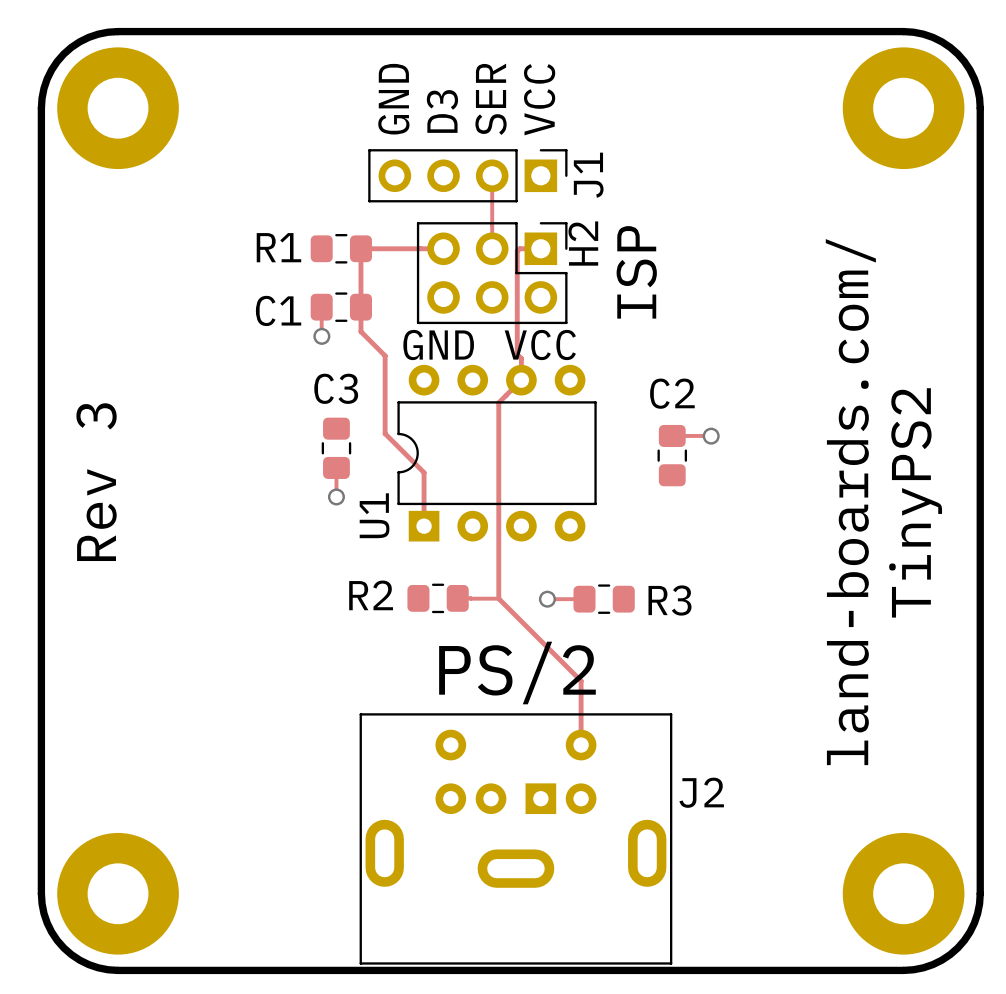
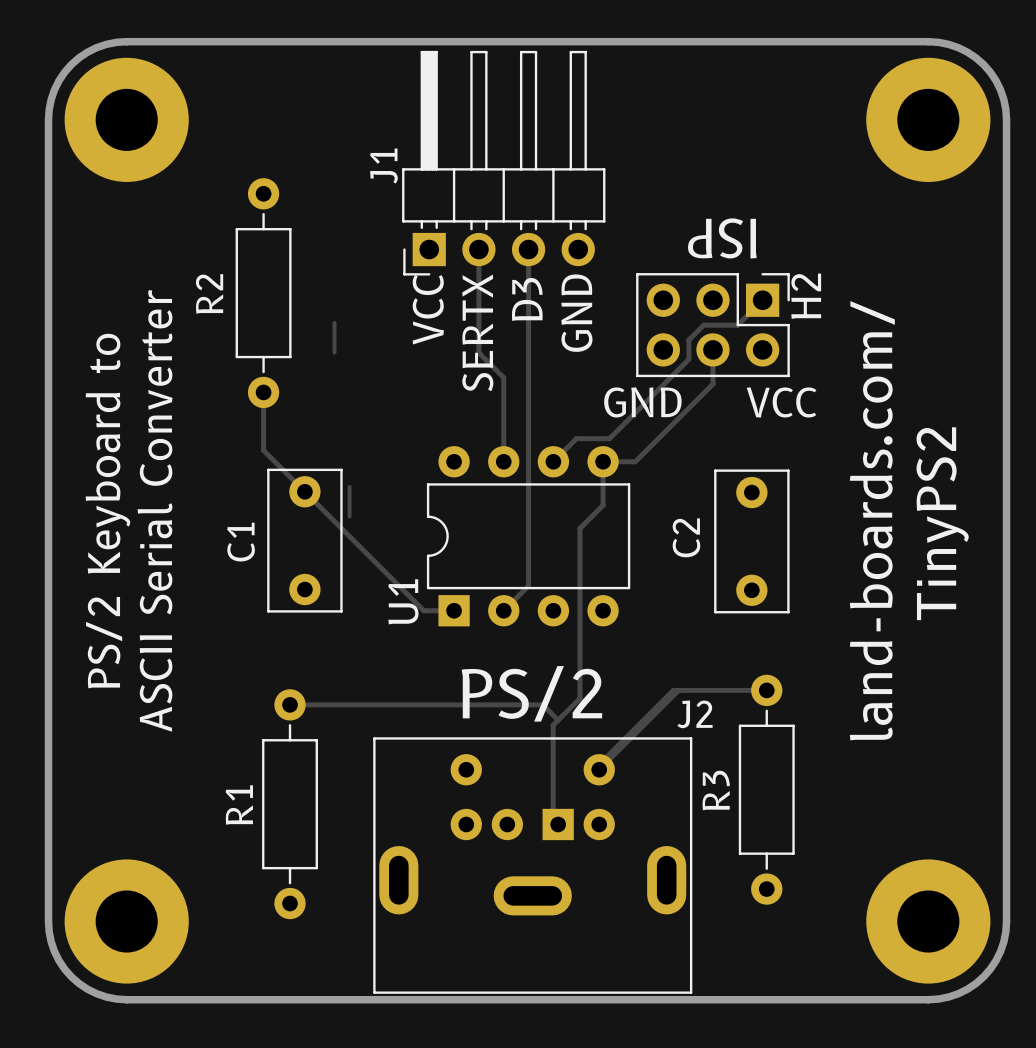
text: GND (393, 99) -> none
text: SER (491, 99) -> none
text: VCC (539, 99) -> none
text position: D3 (442, 111) -> D3 (527, 299)
J1 footprint: [368, 149, 568, 203] -> [402, 50, 606, 276]
track: (492, 175) (492, 248) -> none
J1 name position: J1 (588, 175) -> J1 (384, 166)
R1 footprint: [310, 234, 372, 264] -> [262, 689, 318, 920]
track: none -> (478, 249) (478, 352) (503, 377) (503, 461)
track: none -> (528, 249) (528, 585) (503, 610)
track: (443, 248) (360, 248) (360, 331) (385, 355) (385, 433) (424, 472) (424, 526) -> none
track: (540, 248) (519, 248) (517, 251) (517, 354) (521, 358) (521, 380) (498, 402) (498, 598) -> none
text rotation: 0° (636, 272) -> 90° counterclockwise (722, 238)
H2 position: (492, 273) -> (712, 325)
track: none -> (762, 300) (737, 325) (703, 325) (688, 339) (688, 359) (609, 438) (576, 438) (553, 461)
C1 footprint: [310, 292, 372, 322] -> [267, 468, 343, 613]
text: none -> VCC (428, 309)
text: none -> GND (576, 313)
text: none -> SERTX (477, 332)
track: none -> (712, 349) (712, 384) (635, 461) (603, 461) (603, 505) (579, 528) (579, 698) (553, 725) (553, 824)
via: (321, 336) -> none
text: GND (438, 345) -> none
text: VCC (540, 345) -> none
track: none -> (263, 392) (263, 450) (423, 610) (454, 610)
text: none -> GND (642, 402)
text: none -> VCC (781, 402)
C2 name position: C2 (672, 393) -> C2 (686, 537)
C2 footprint: [657, 424, 688, 487] -> [714, 469, 790, 614]
track: (672, 435) (711, 435) -> none
via: (711, 436) -> none
C3: (336, 448) -> none
U1 position: (497, 453) -> (528, 536)
text: Rev 3 (96, 482) -> PS/2 Keyboard to (107, 511)
text: none -> ASCII Serial Converter (155, 510)
via: (336, 496) -> none
R2 footprint: [407, 583, 469, 614] -> [235, 178, 292, 409]
R3 footprint: [573, 584, 635, 614] -> [738, 674, 795, 905]
track: (457, 598) (498, 598) -> none
track: (498, 598) (581, 681) (581, 745) -> (678, 690) (599, 769)
track: (547, 599) (584, 599) -> none
via: (547, 599) -> none
R3 name position: R3 (669, 600) -> R3 (716, 790)
track: none -> (766, 690) (673, 690) (594, 769)
track: none -> (290, 704) (542, 704) (558, 720)
J2 name position: J2 (701, 792) -> J2 (695, 714)

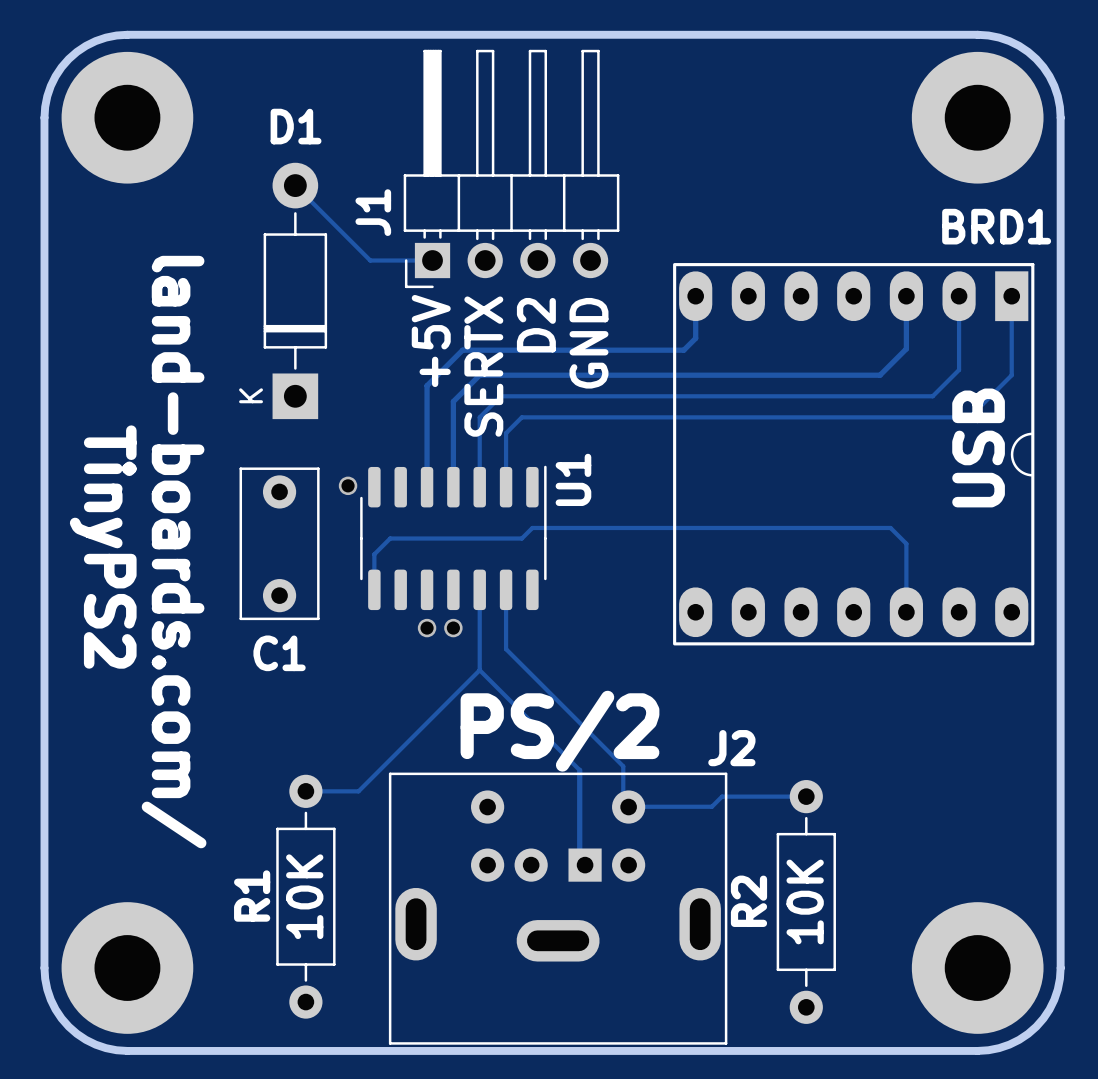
J1 position: (503, 163) -> (511, 168)
J1 name position: J1 (384, 166) -> J1 (373, 212)
track: none -> (295, 185) (370, 260) (432, 260)
text: ISP (722, 238) -> none
track: (478, 249) (478, 352) (503, 377) (503, 461) -> none
track: (528, 249) (528, 585) (503, 610) -> none
D1: none -> (295, 290)
track: none -> (695, 296) (695, 338) (683, 350) (462, 350) (427, 385) (427, 487)
track: none -> (906, 296) (906, 348) (880, 375) (479, 375) (453, 401) (453, 487)
track: none -> (959, 296) (959, 369) (932, 396) (500, 396) (479, 417) (479, 487)
track: none -> (1011, 296) (1011, 375) (969, 417) (521, 417) (506, 433) (506, 487)
R2 position: (263, 293) -> (806, 901)
text: D3 (527, 299) -> D2 (536, 325)
track: (762, 300) (737, 325) (703, 325) (688, 339) (688, 359) (609, 438) (576, 438) (553, 461) -> none
text: VCC (428, 309) -> +5V (431, 341)
text position: GND (576, 313) -> GND (588, 343)
track: (334, 322) (334, 352) -> none
H2: (712, 325) -> none
text position: SERTX (477, 332) -> SERTX (483, 366)
track: (712, 349) (712, 384) (635, 461) (603, 461) (603, 505) (579, 528) (579, 698) (553, 725) (553, 735) -> (479, 670) (579, 770)
track: (263, 392) (263, 450) (423, 610) (454, 610) -> none
text: GND (642, 402) -> none
text: VCC (781, 402) -> none
text: none -> USB (978, 447)
BRD1: none -> (853, 454)
U1 footprint: [426, 446, 631, 627] -> [360, 465, 547, 611]
via: none -> (348, 485)
track: (349, 486) (349, 516) -> none
text: ASCII Serial Converter (155, 510) -> none
text: PS/2 Keyboard to (107, 511) -> TinyPS2 (103, 547)
text: land-boards.com/ (872, 520) -> none
text: TinyPS2 (942, 523) -> none
text: none -> land-boards.com/ (174, 552)
C1 position: (304, 540) -> (279, 543)
C2: (751, 541) -> none
C1 name rotation: 0° (241, 542) -> 90° clockwise (279, 653)
C1 name position: C1 (241, 542) -> C1 (279, 653)
track: none -> (374, 589) (374, 554) (390, 538) (521, 538) (532, 527) (890, 527) (906, 543) (906, 612)
track: none -> (479, 589) (479, 670)
track: none -> (506, 589) (506, 649) (623, 766) (623, 806) (711, 806) (722, 796) (806, 796)
U1 name position: U1 (403, 601) -> U1 (573, 479)
via: none -> (427, 628)
via: none -> (453, 628)
track: none -> (479, 670) (358, 791) (305, 791)
track: (678, 690) (599, 769) -> none
track: (766, 690) (673, 690) (594, 769) -> none
track: (290, 704) (542, 704) (558, 720) -> none
R3: (766, 789) -> none
R1 position: (290, 804) -> (305, 896)
R1 value: none -> 10K (304, 896)
R2 value: none -> 10K (805, 901)

